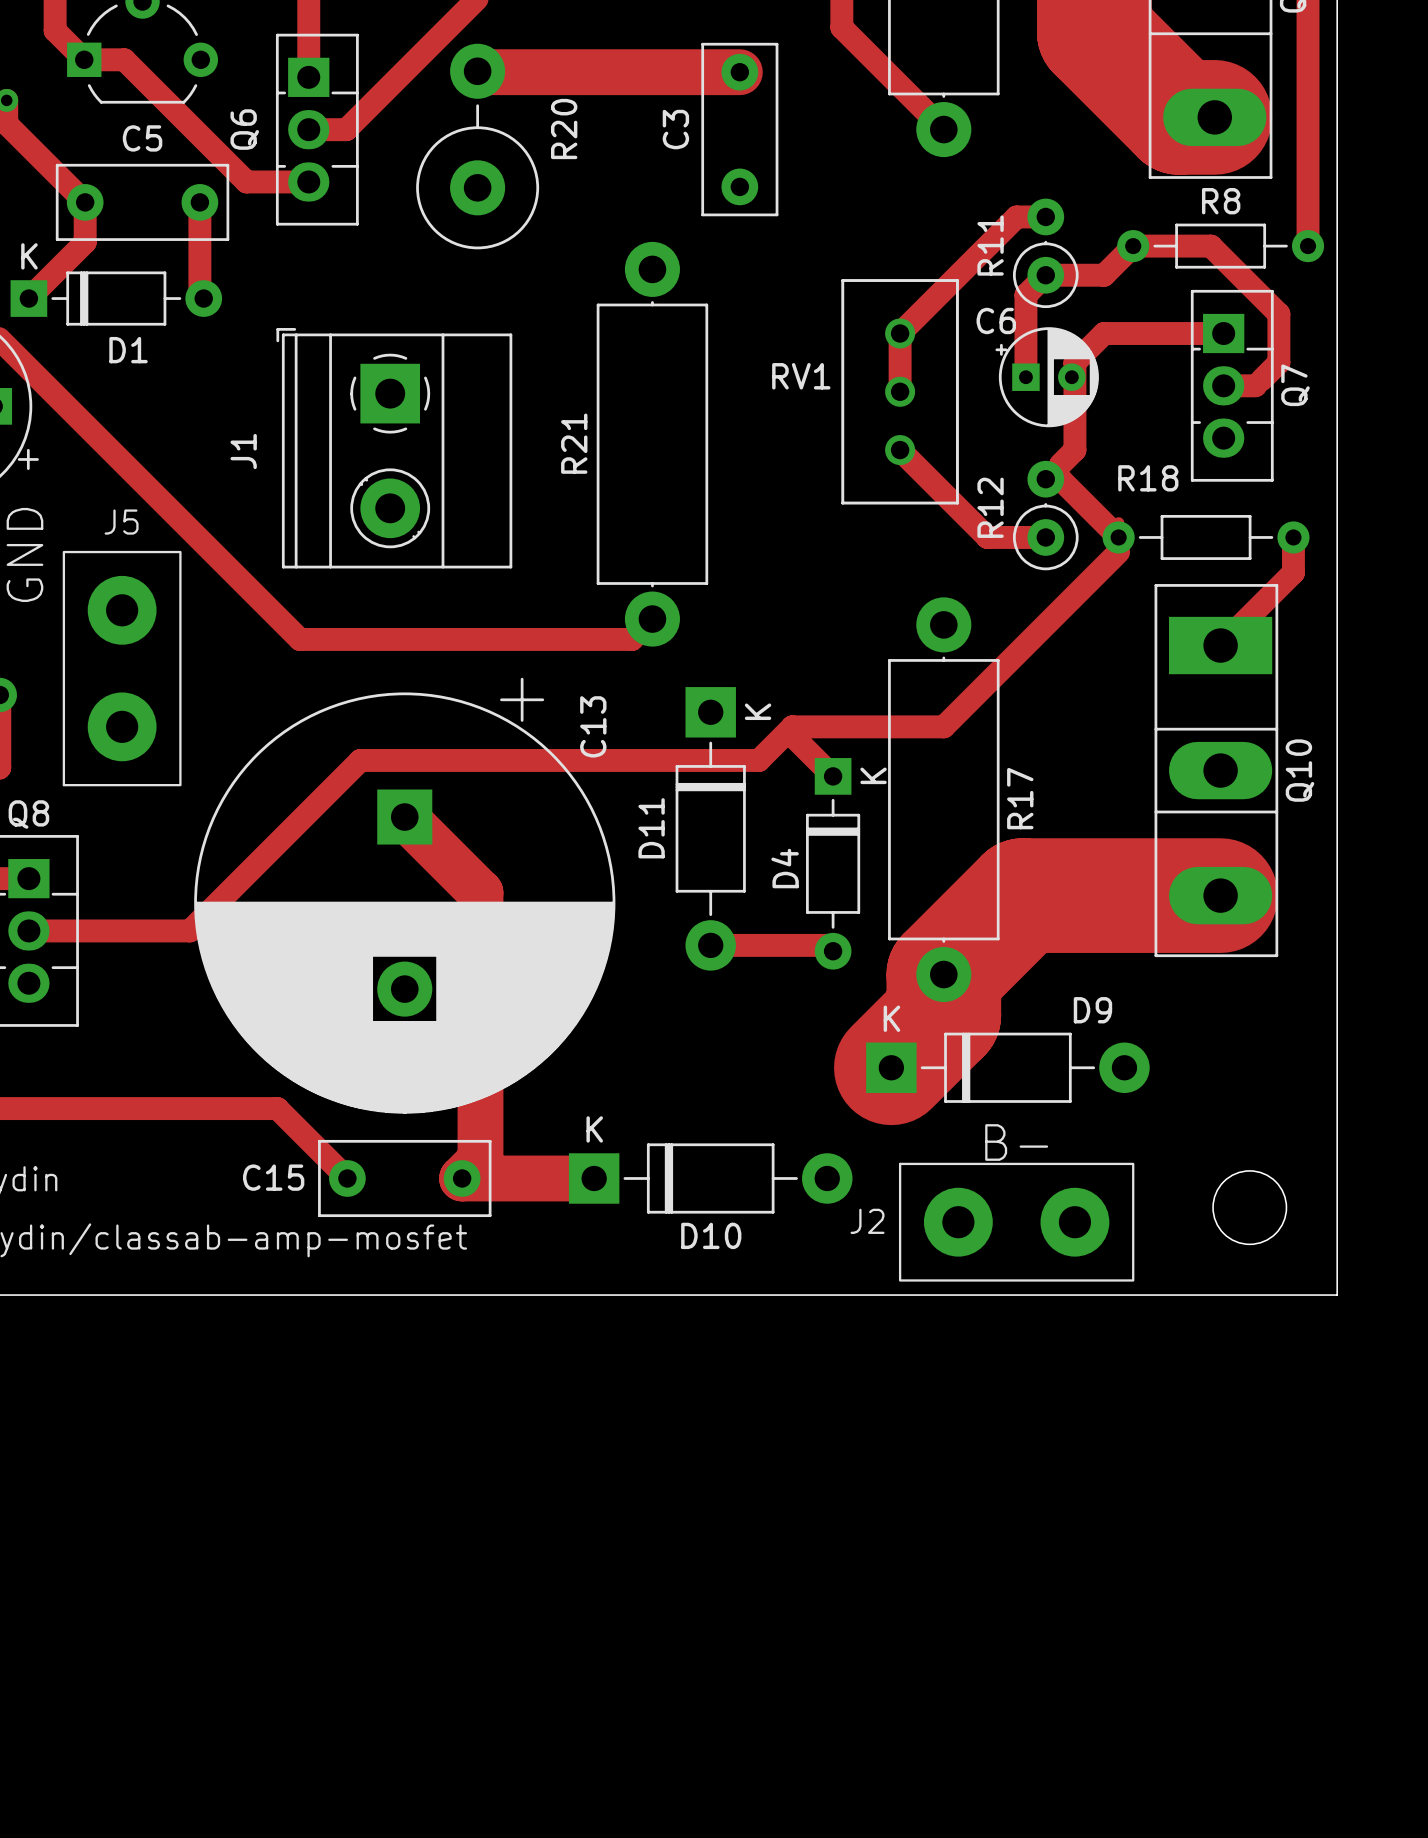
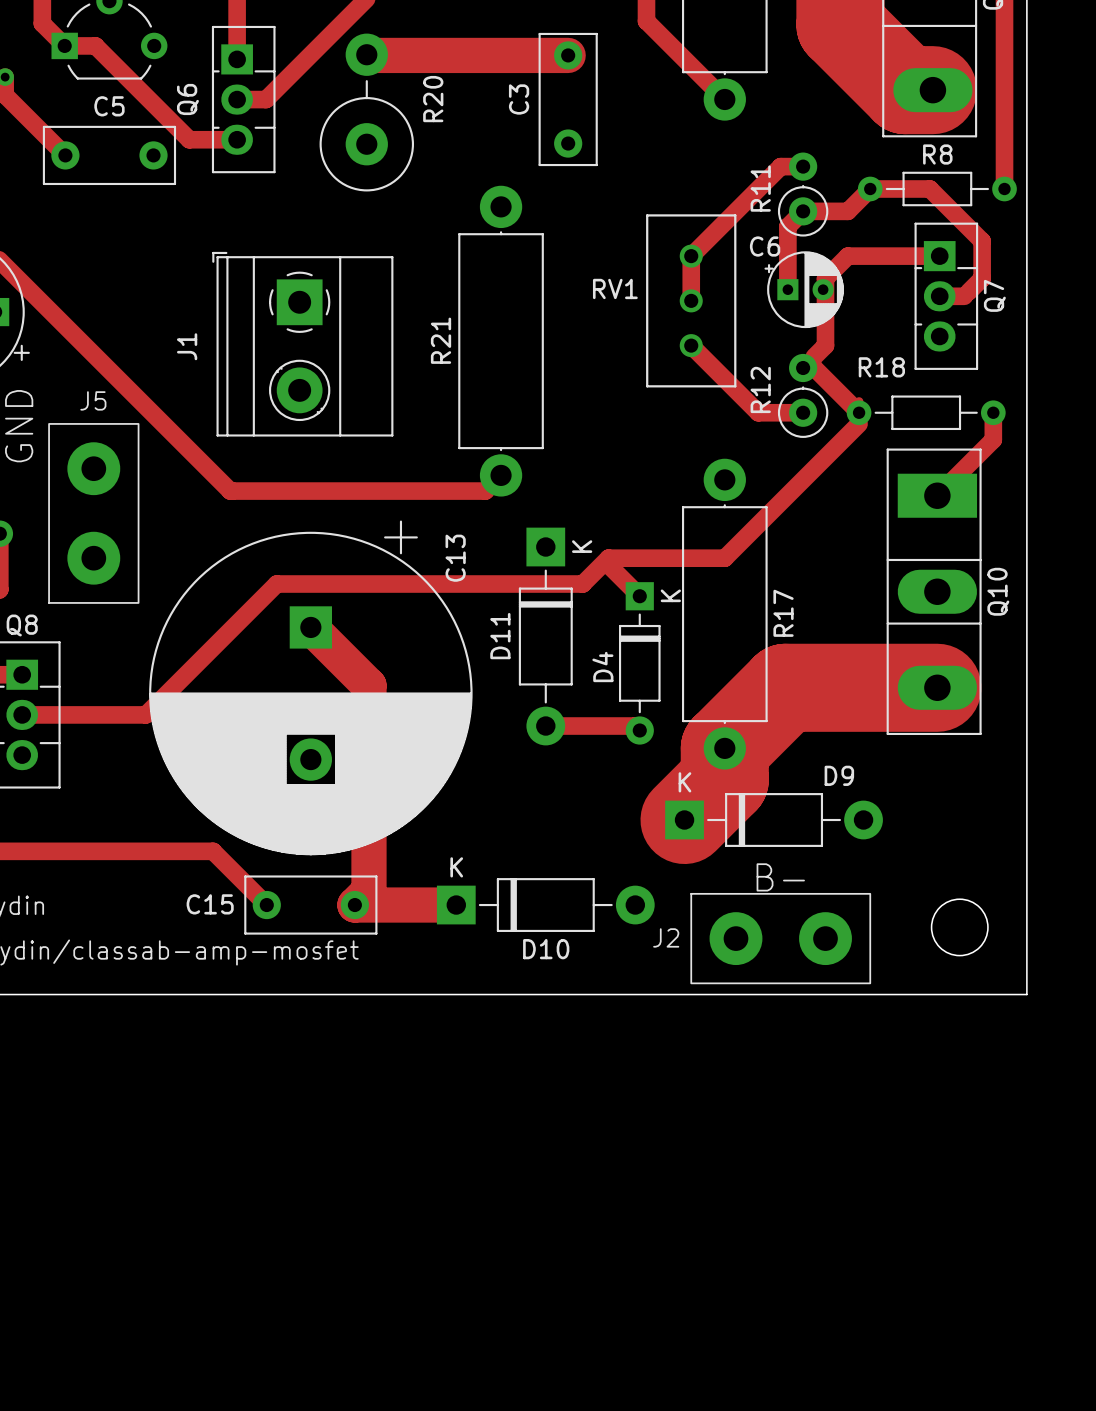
track: (85, 202) (85, 242) (28, 298) -> none
track: (199, 202) (199, 294) (203, 298) -> none
D1: (116, 298) -> none

